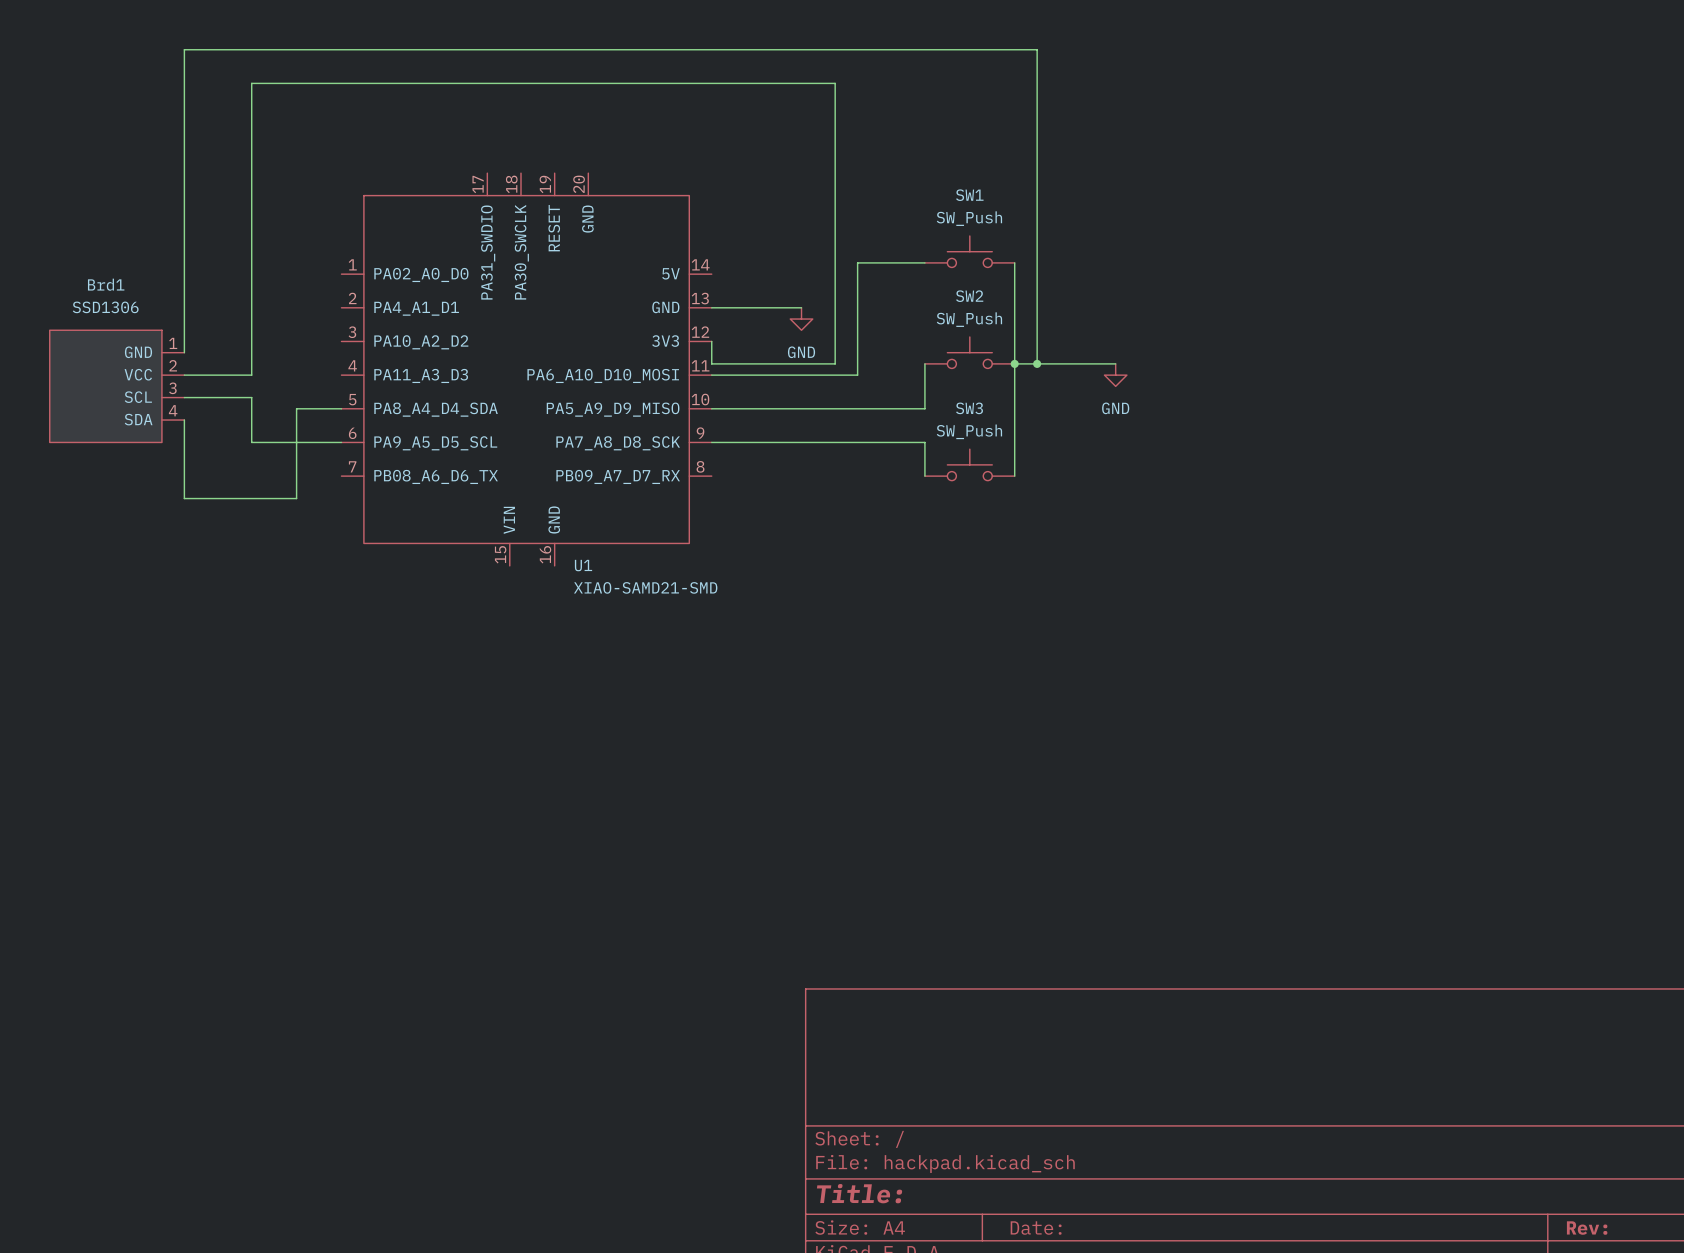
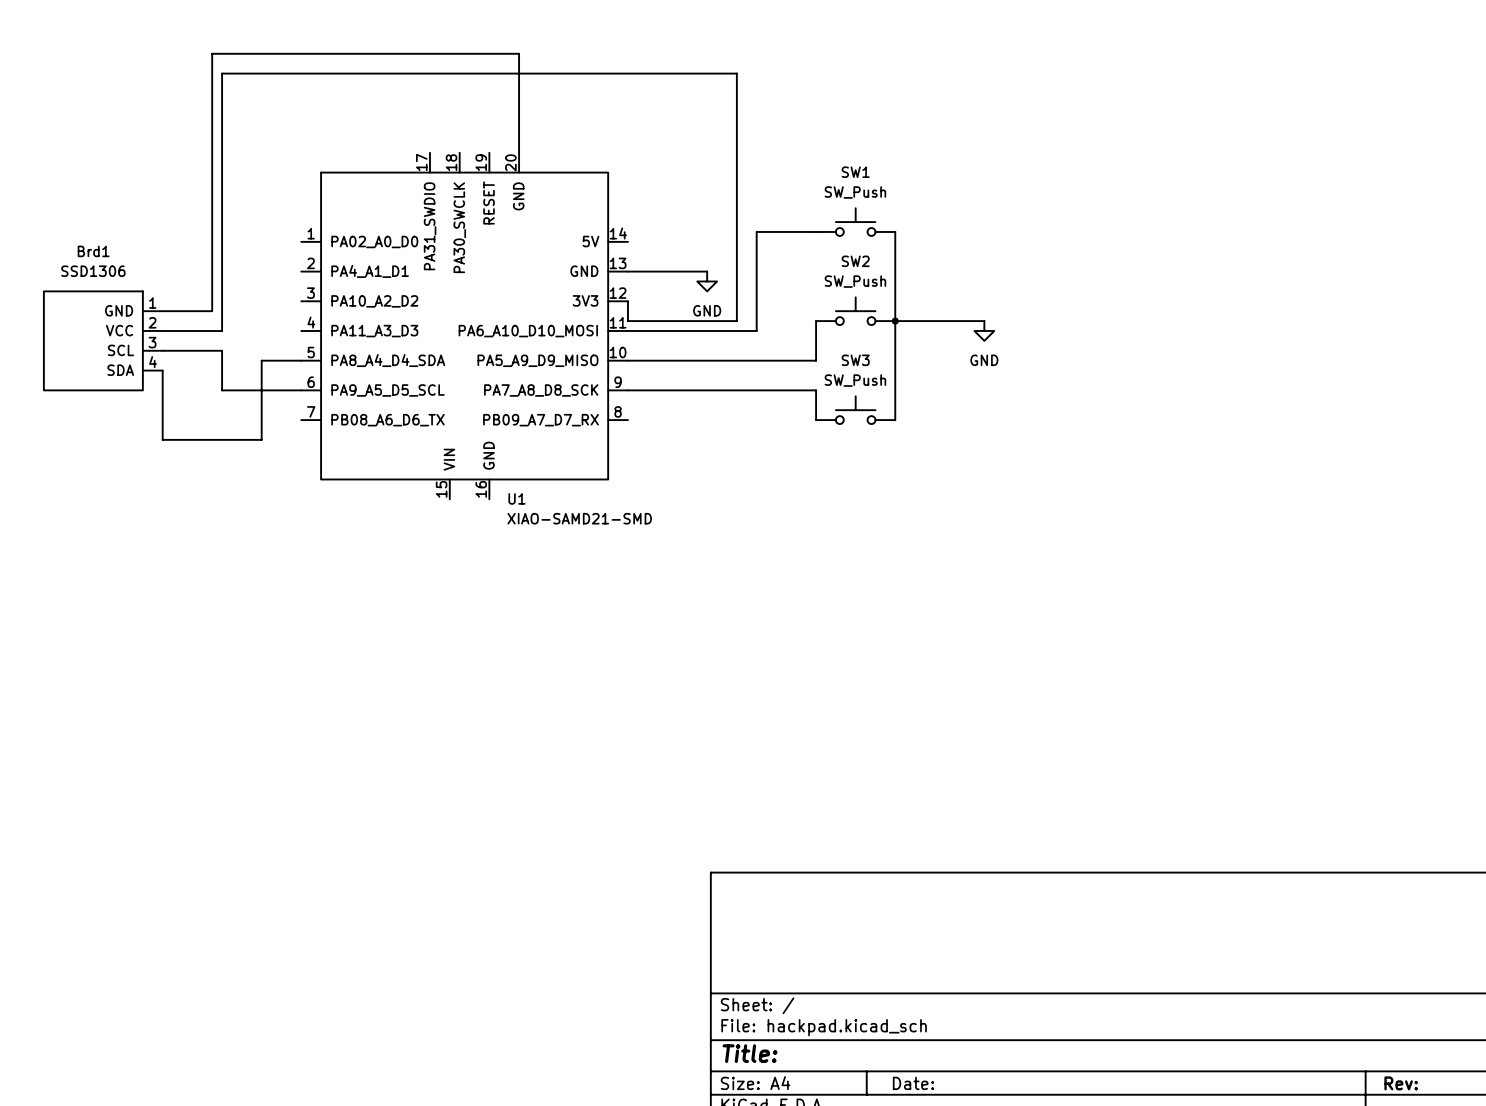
wire: (184, 352) (184, 49) (1037, 49) (1037, 363) -> (162, 311) (212, 311) (212, 53) (519, 53) (519, 152)
junction: (1037, 363) -> none

